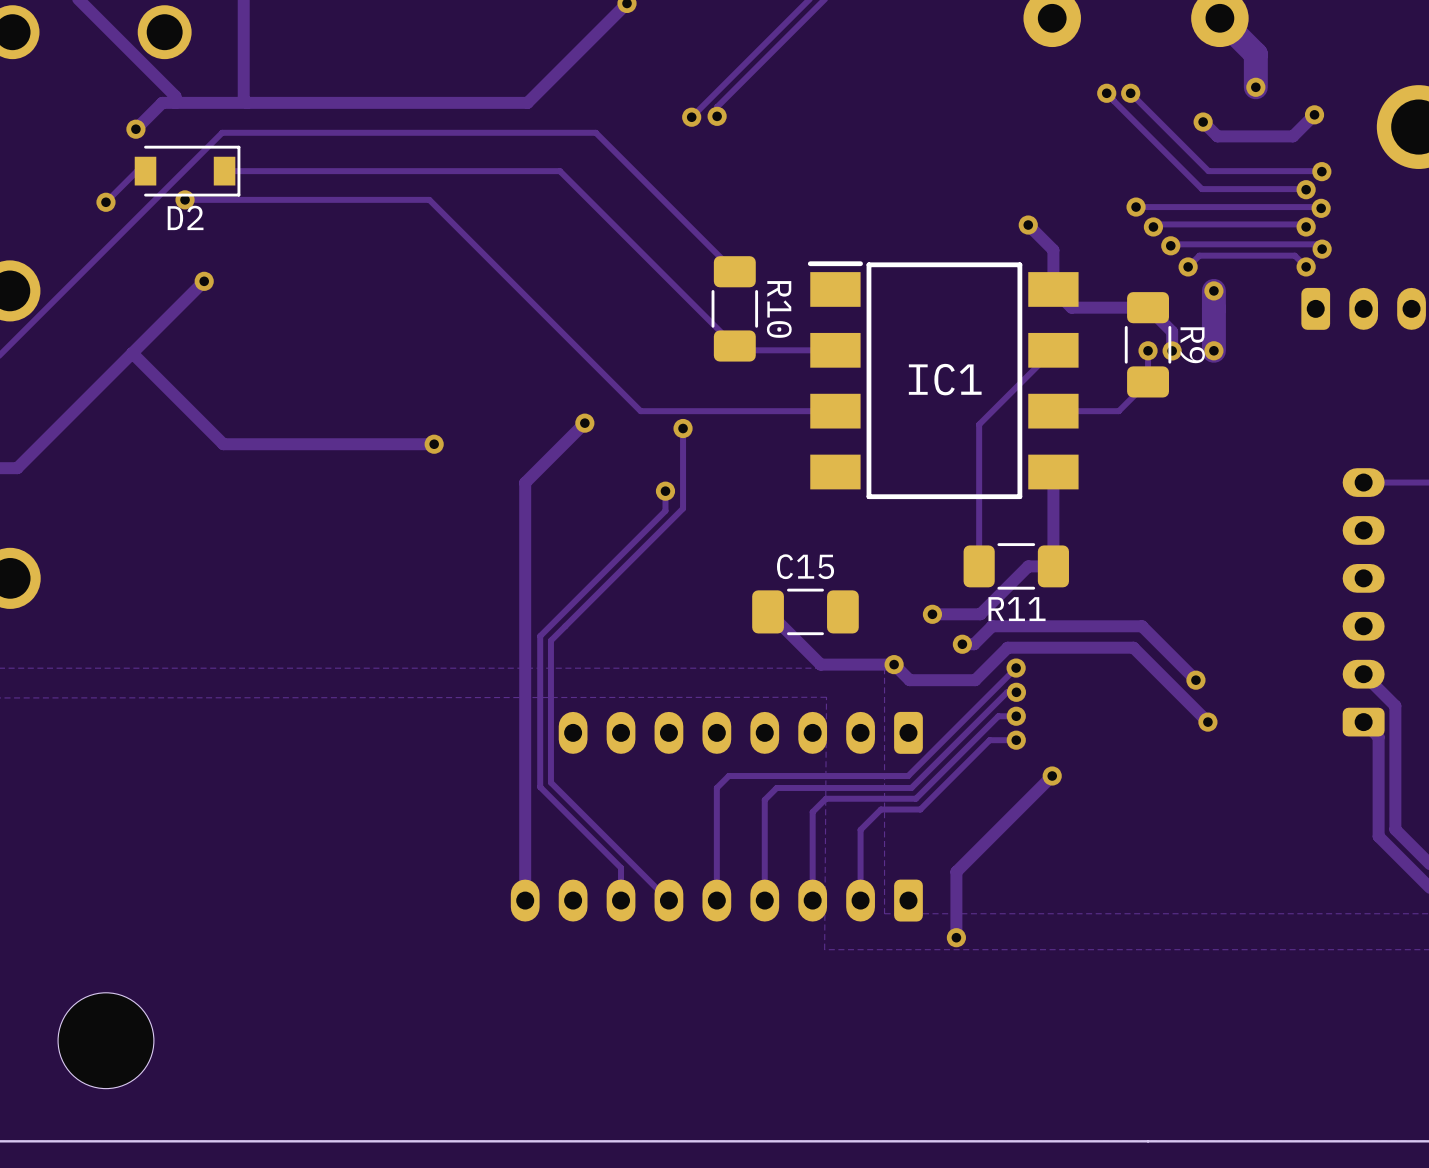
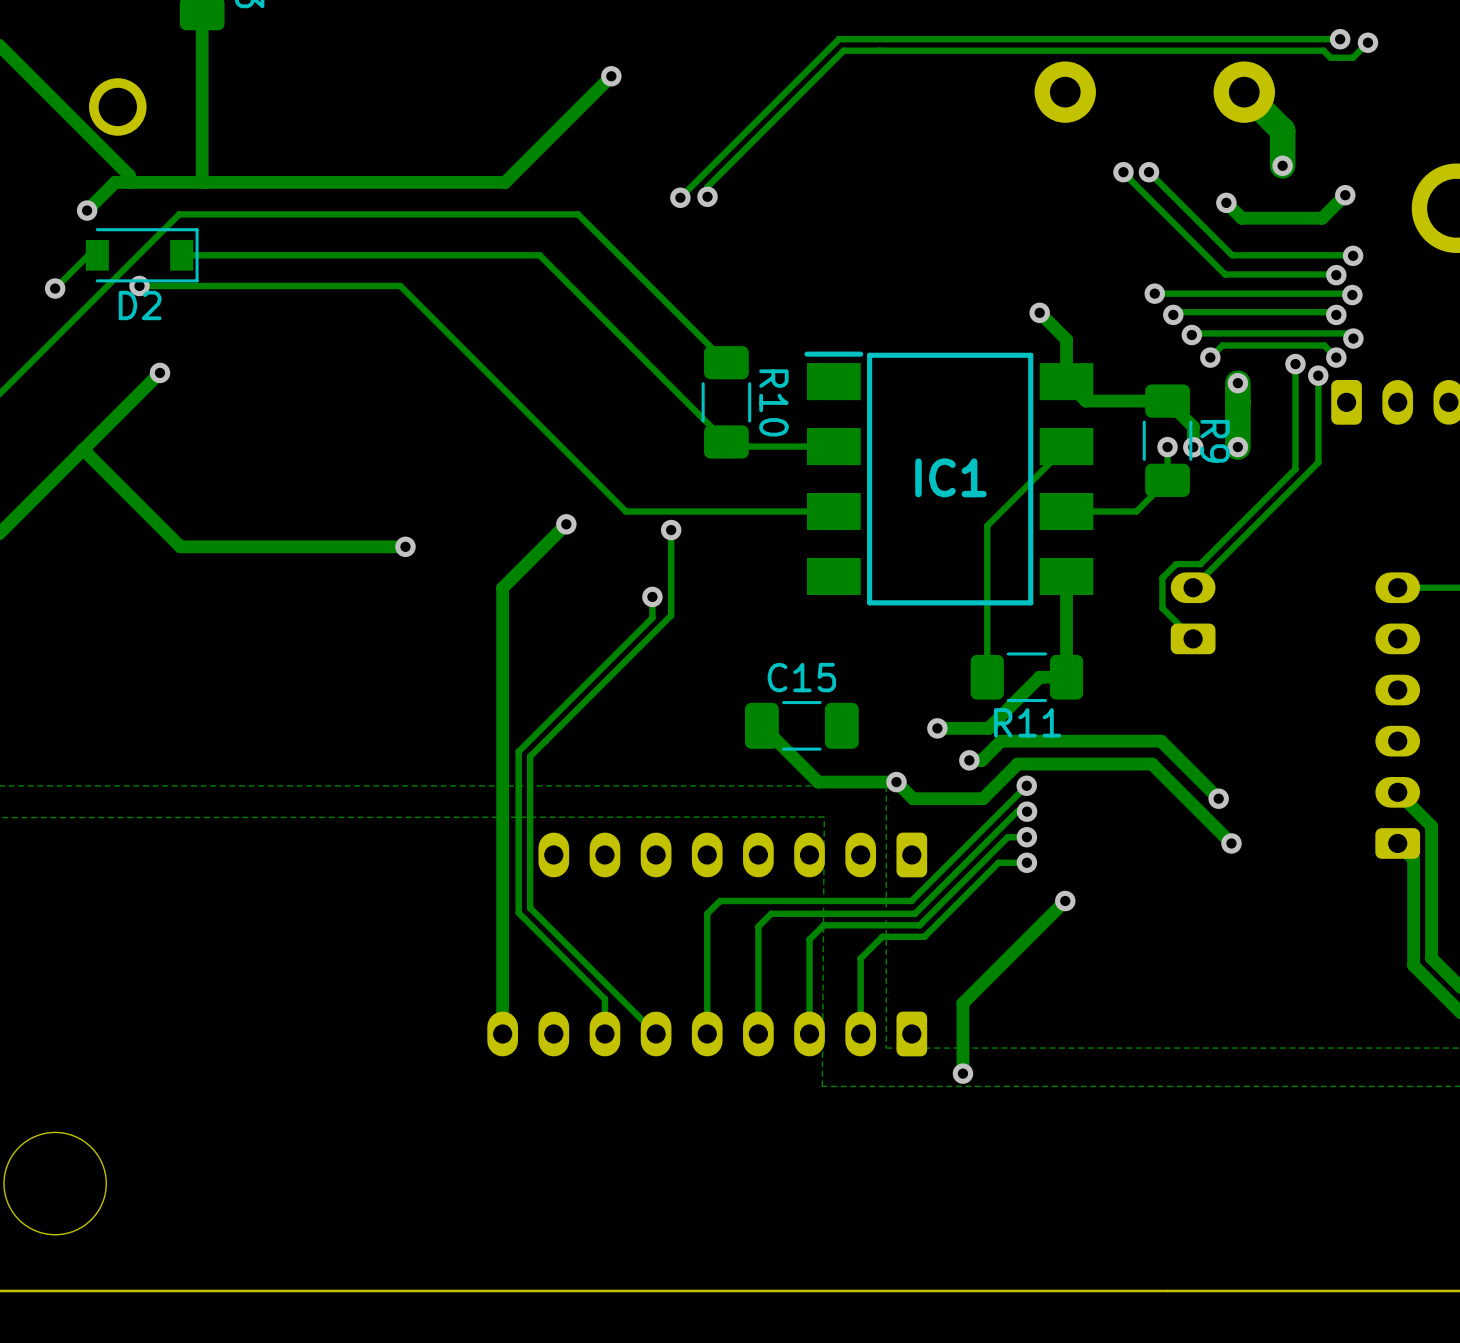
track: none -> (1295, 364) (1295, 469) (1200, 564) (1176, 564) (1162, 577) (1162, 608) (1193, 638)
via: none -> (1295, 364)
via: none -> (1318, 375)
track: none -> (1318, 375) (1318, 462) (1193, 587)
part: none -> (1193, 613)

